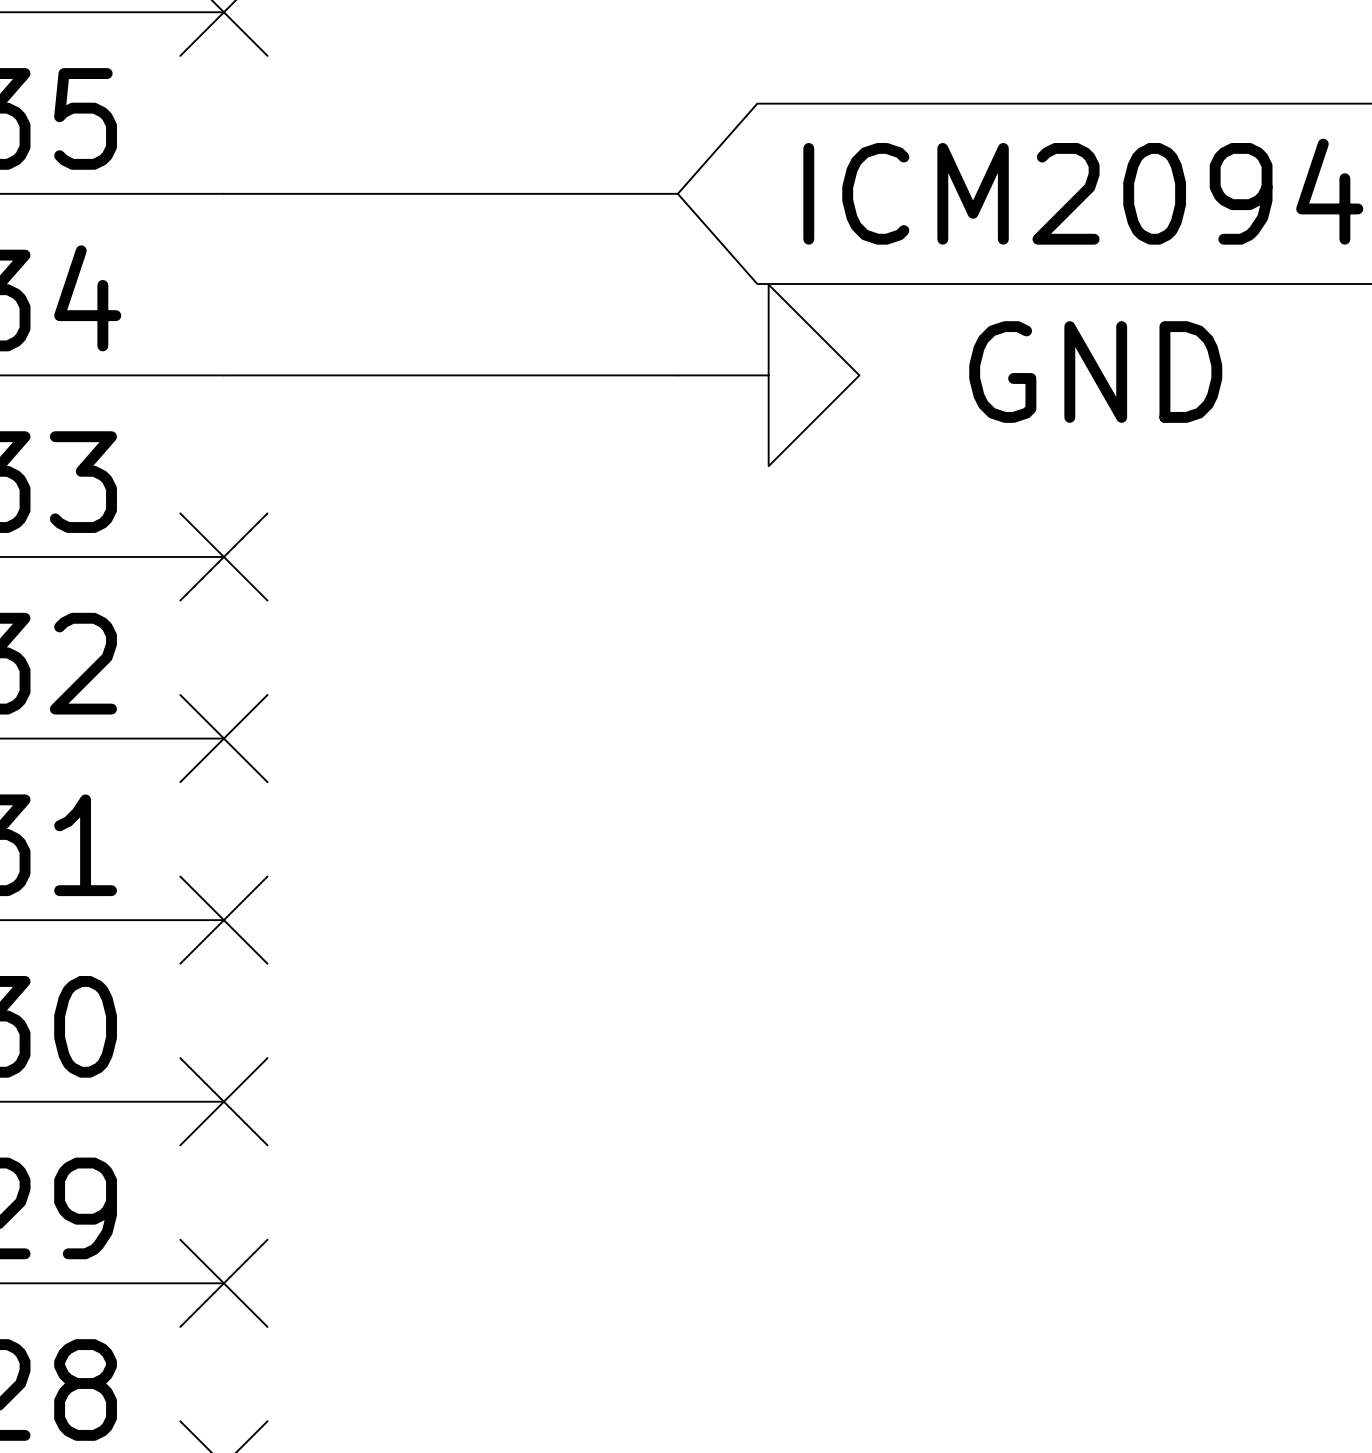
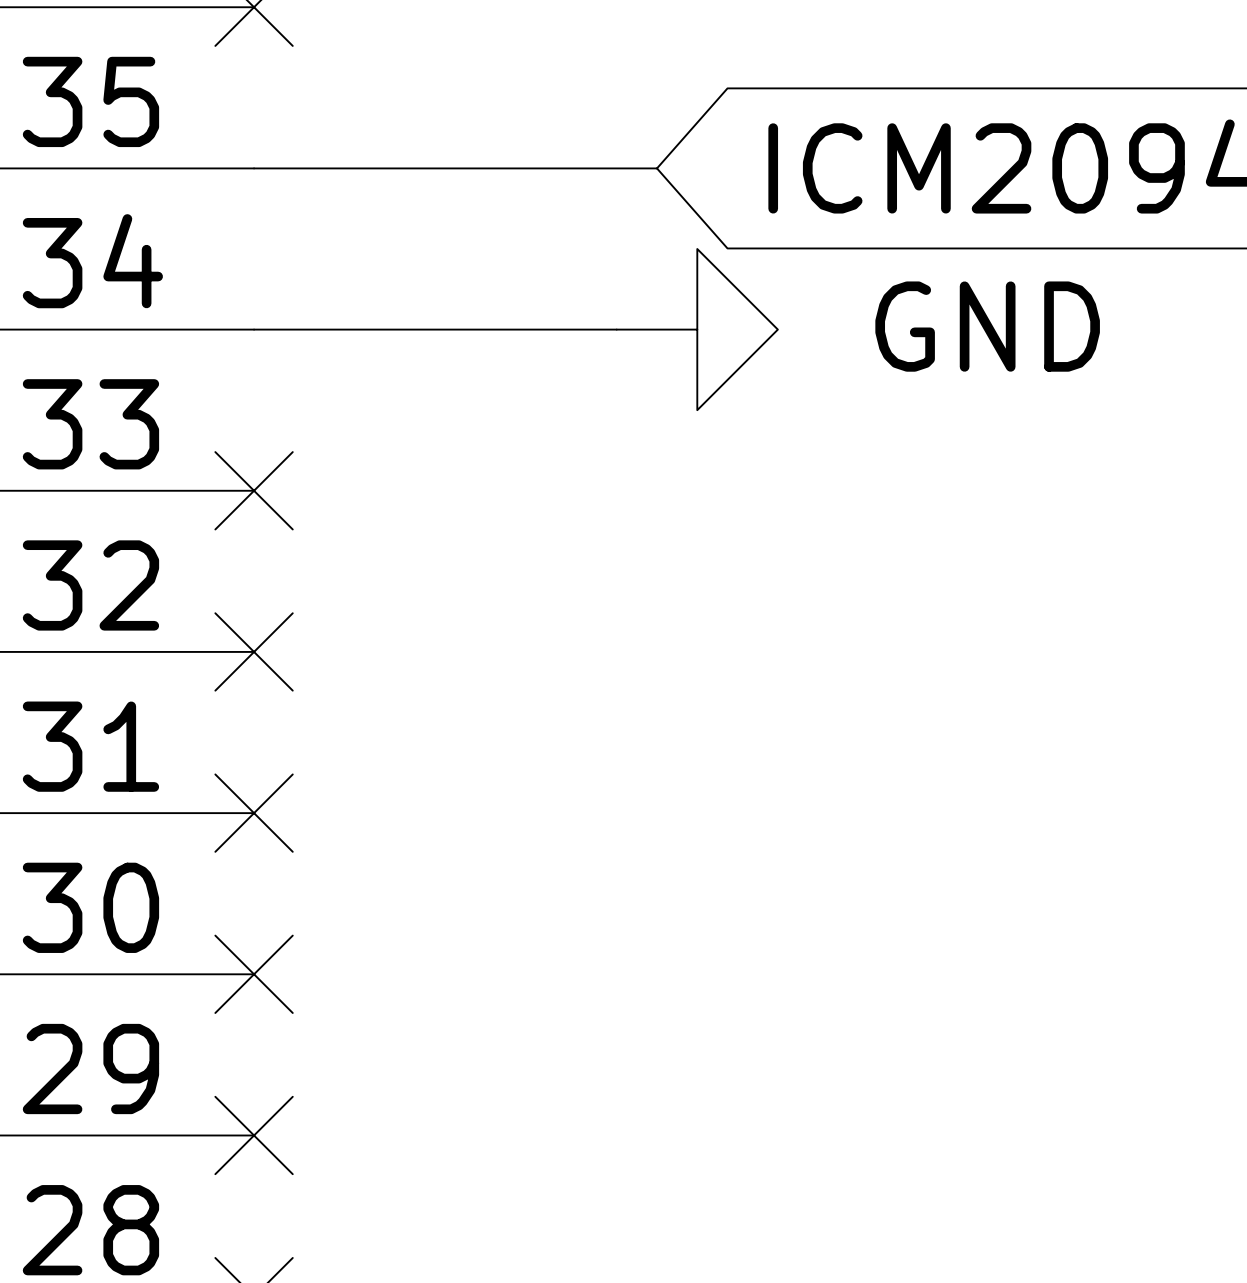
power symbol position: GND (768, 375) -> GND (697, 329)

